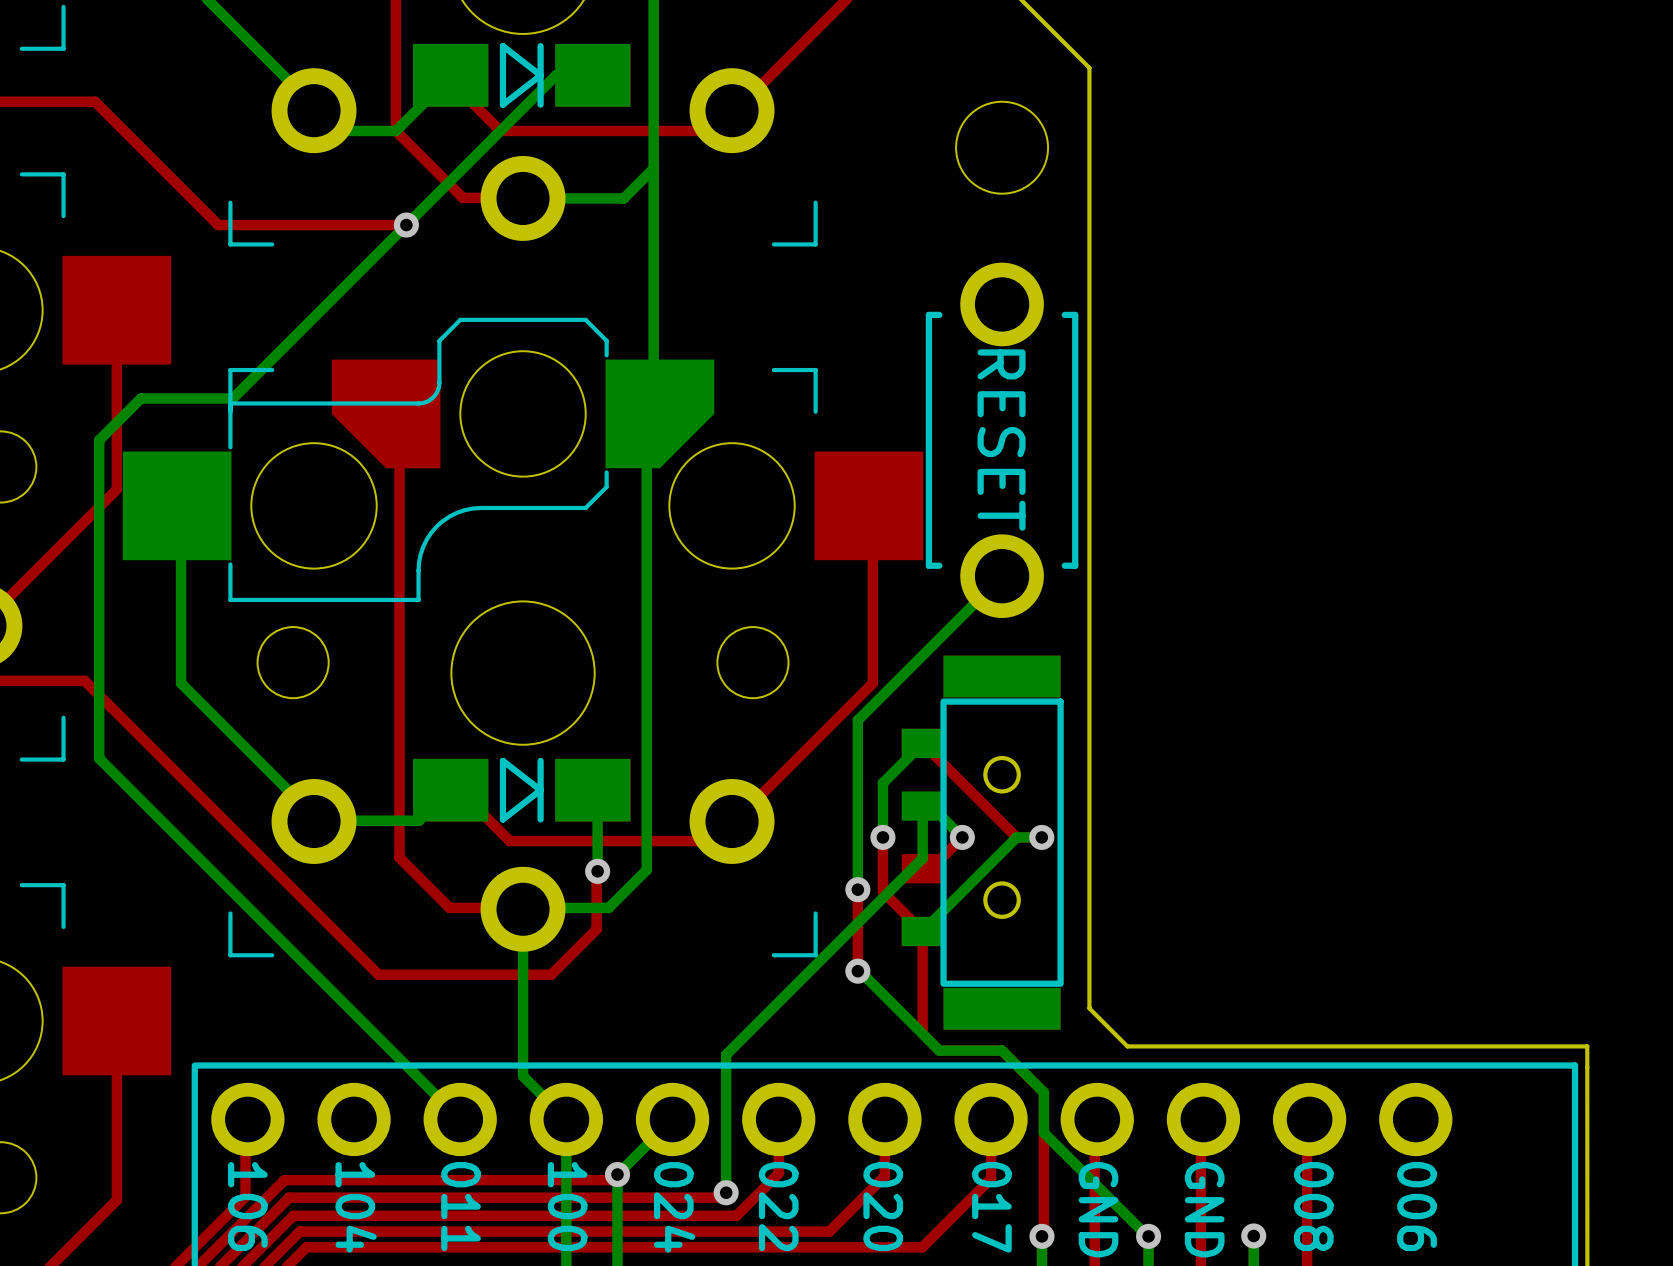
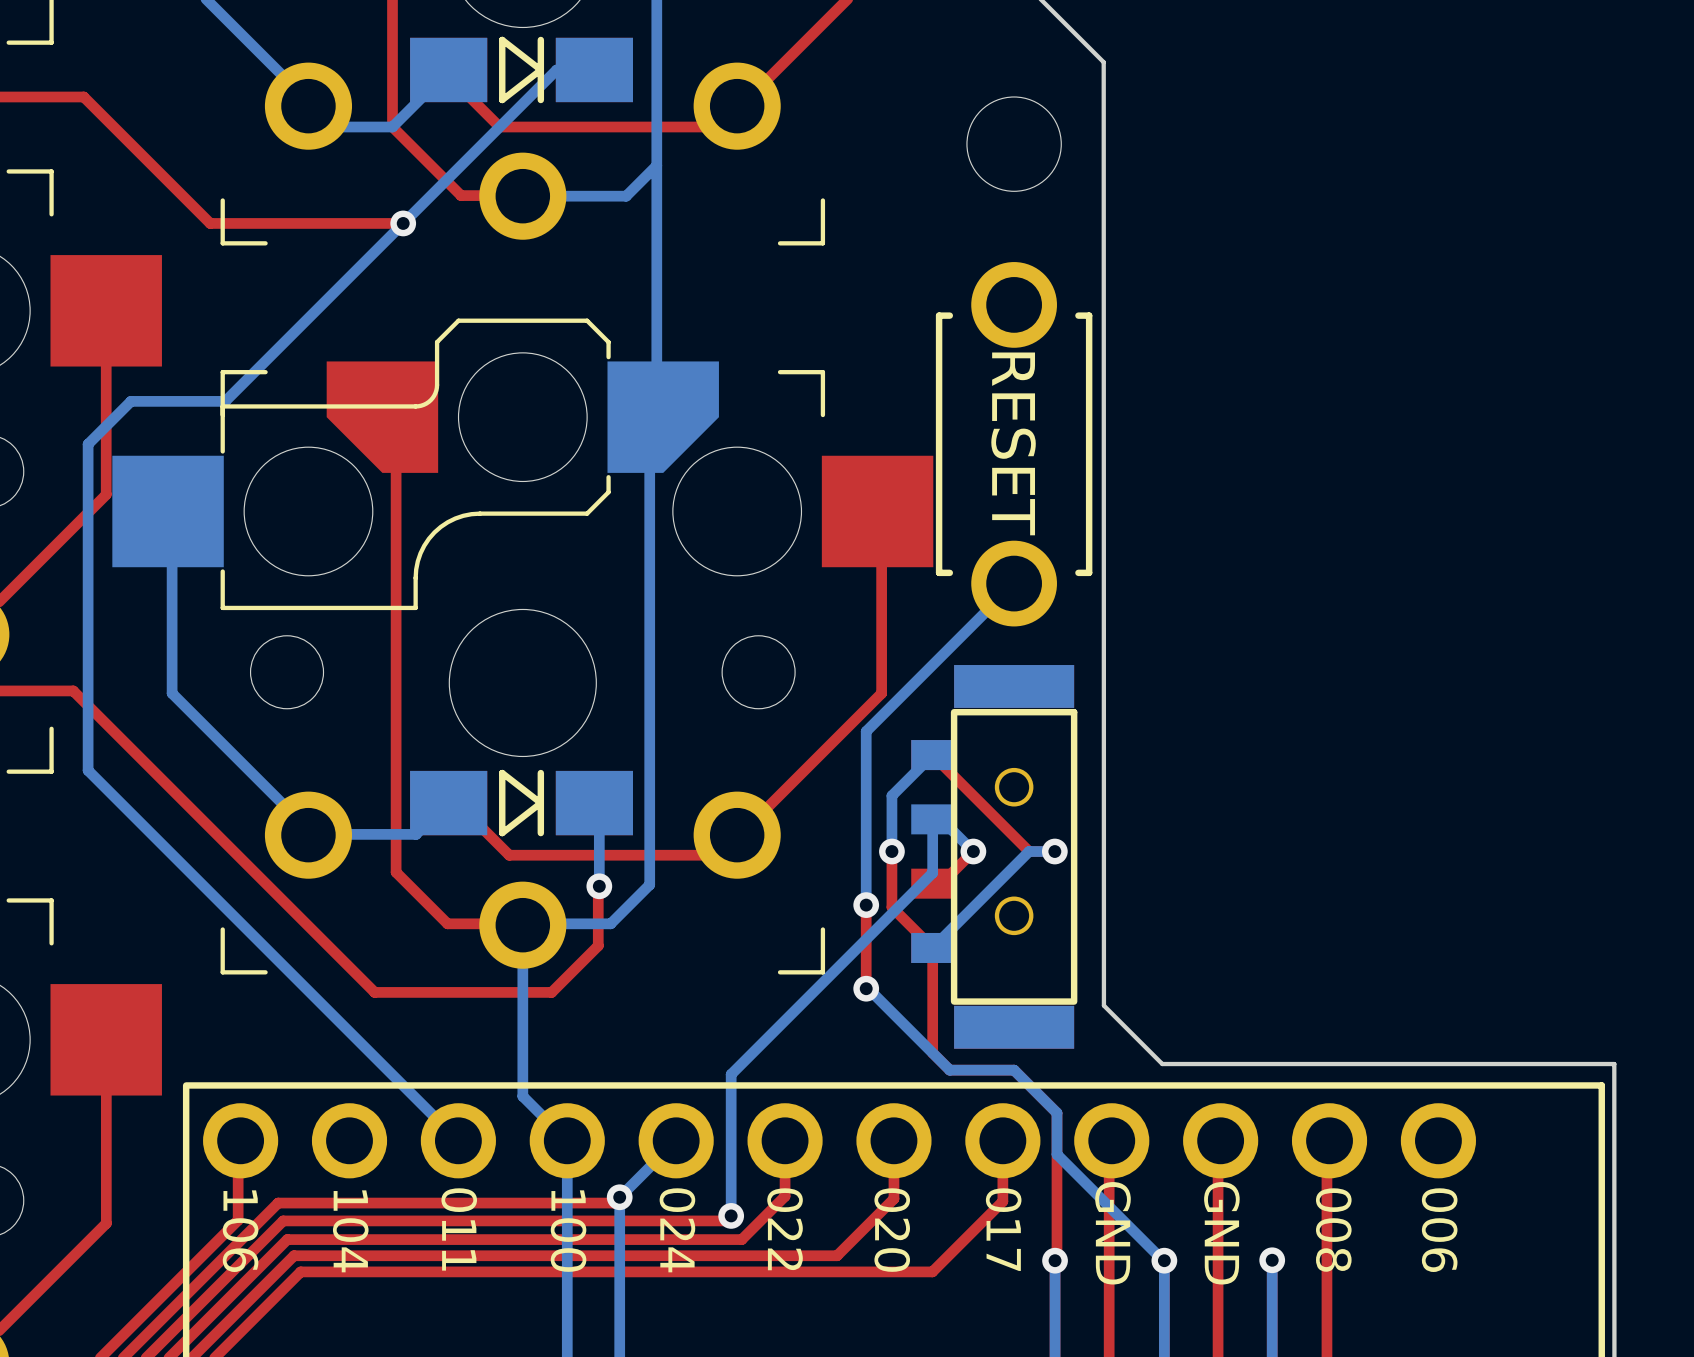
board edge: (1089, 67) (1089, 1008) (1127, 1046) (1587, 1046) (1587, 1067) -> (1103, 62) (1103, 1005) (1162, 1064) (1614, 1064) (1614, 1087)

